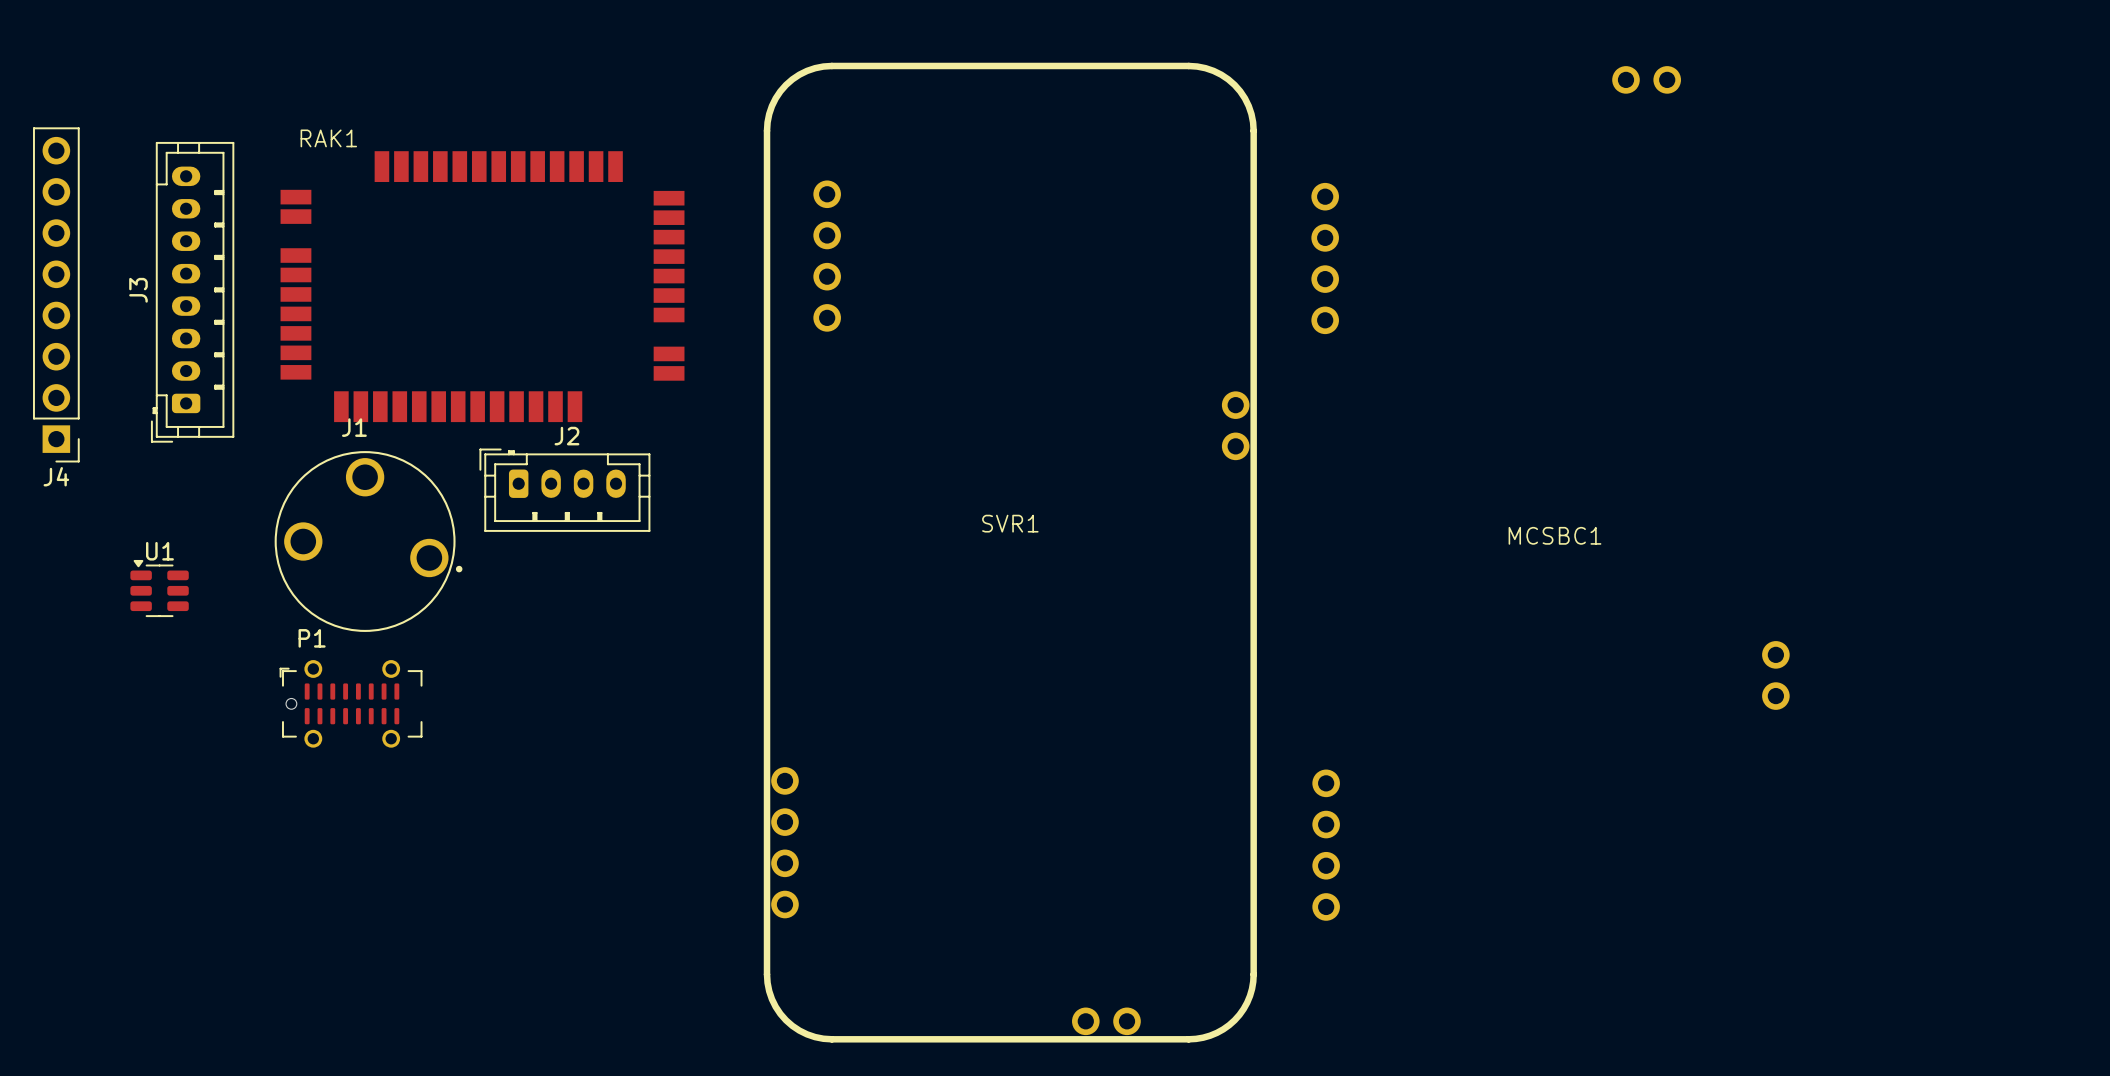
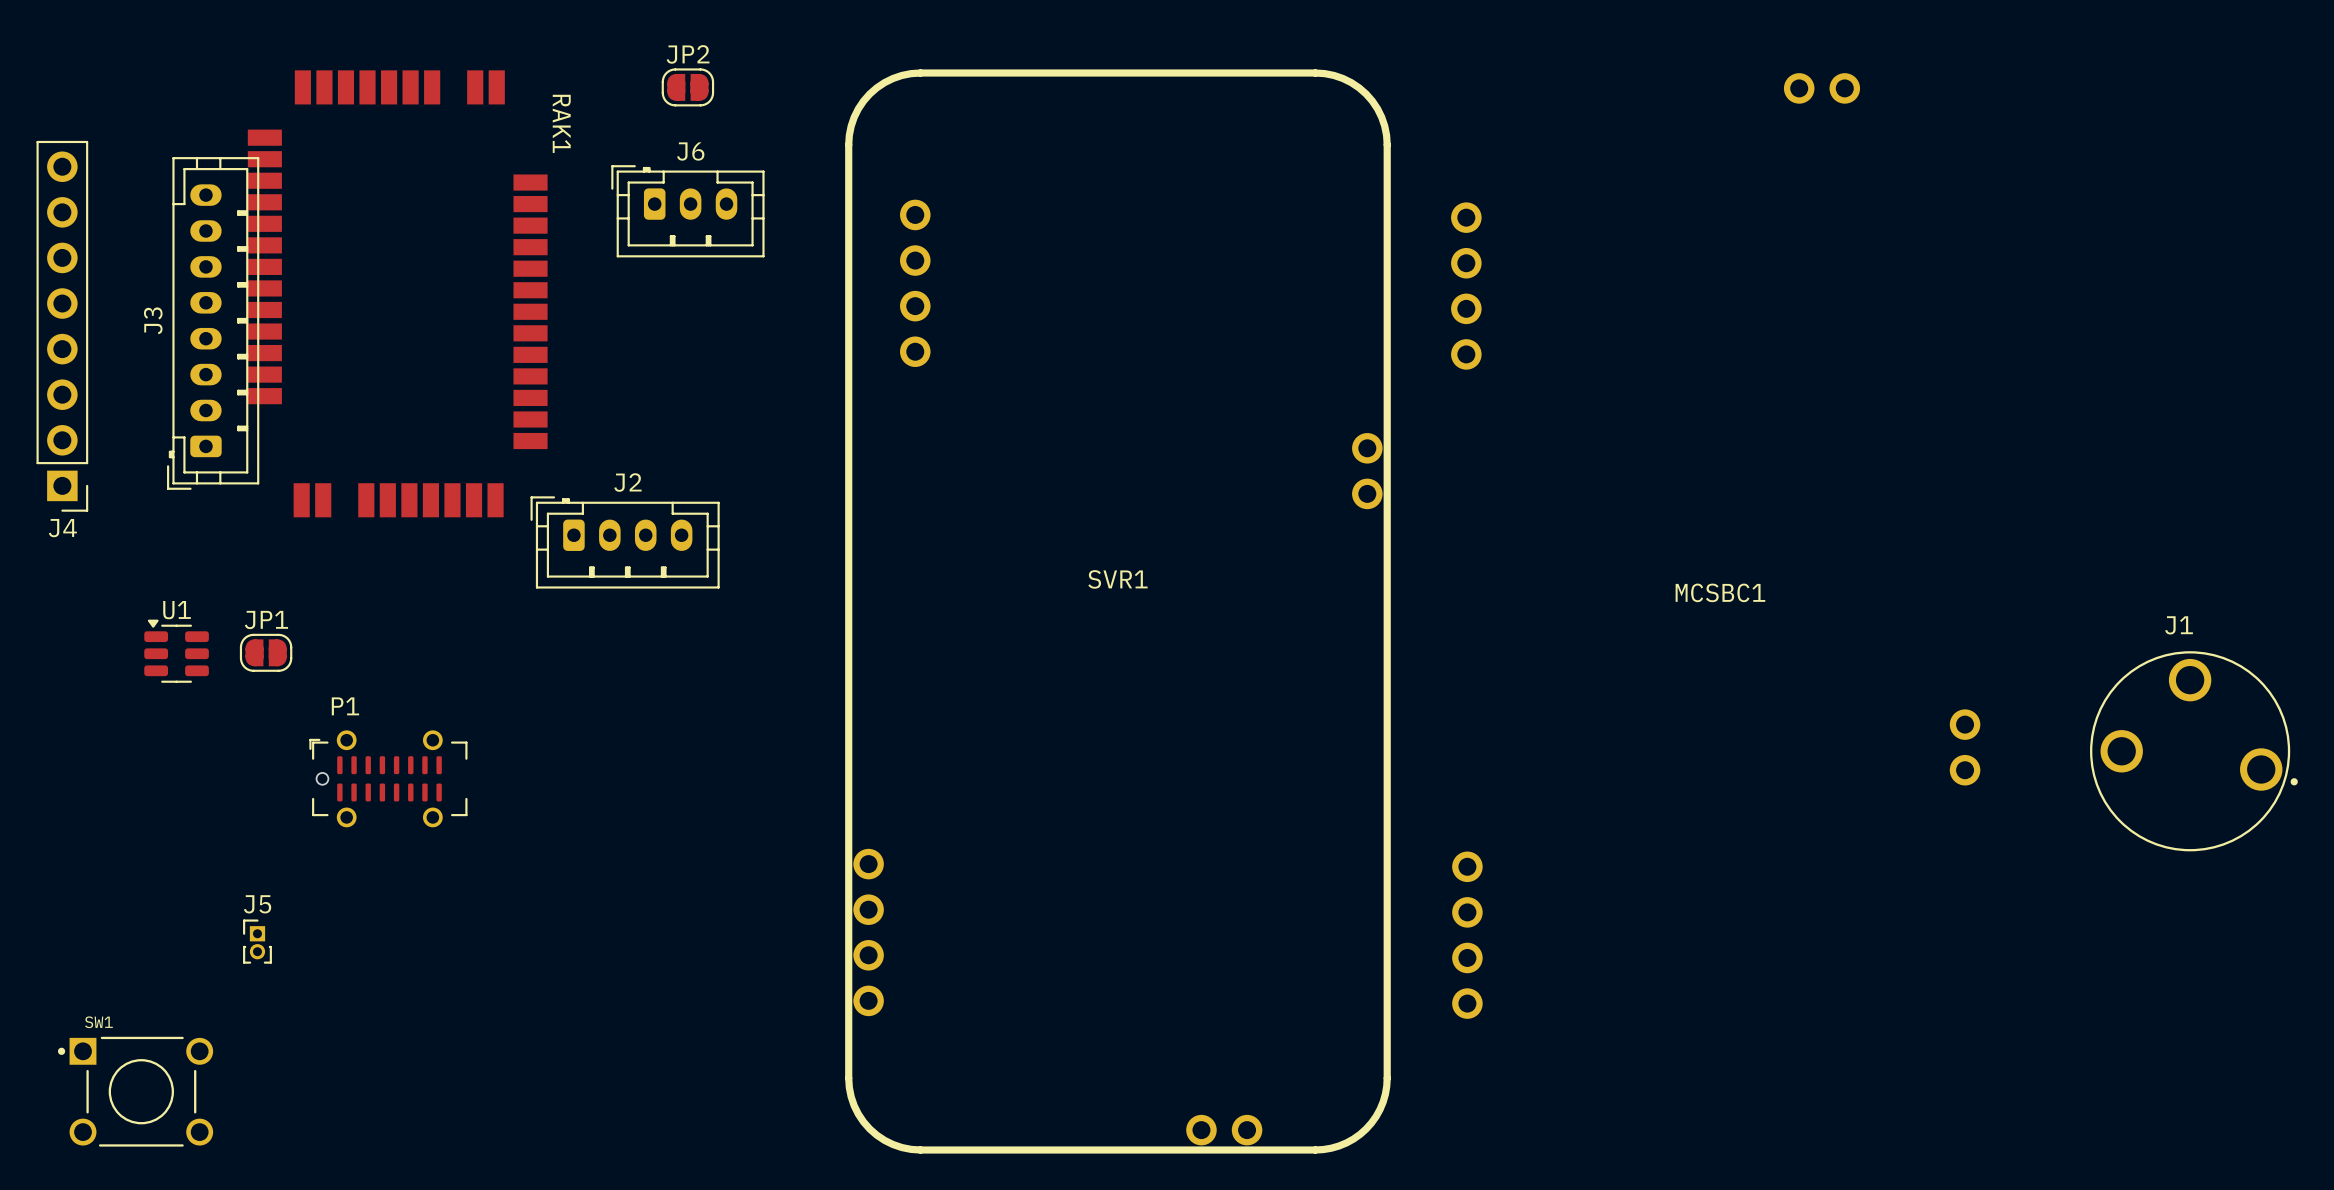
JP2: none -> (687, 87)
J6: none -> (687, 211)
RAK1 rotation: 0° (482, 286) -> 90° clockwise (397, 293)
J1 position: (368, 541) -> (2193, 751)
JP1: none -> (266, 652)
J5: none -> (257, 941)
SW1: none -> (135, 1091)

